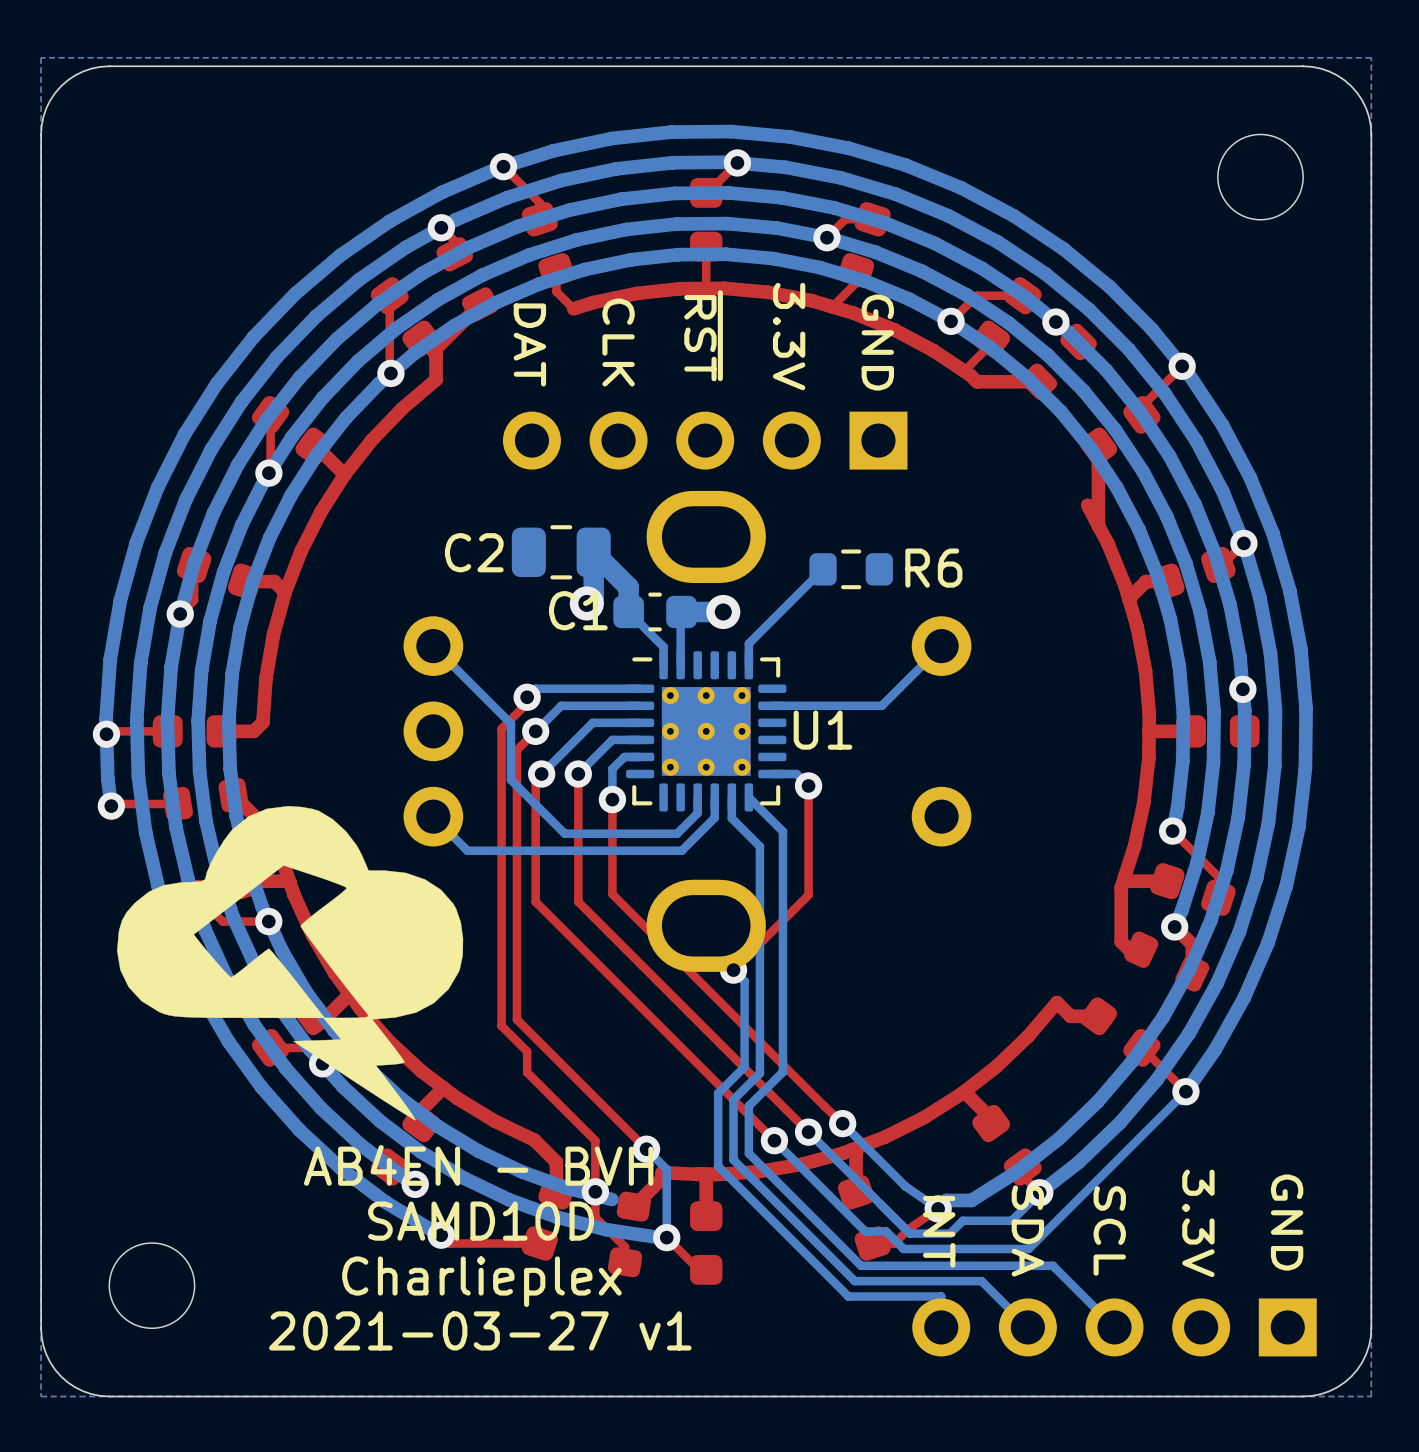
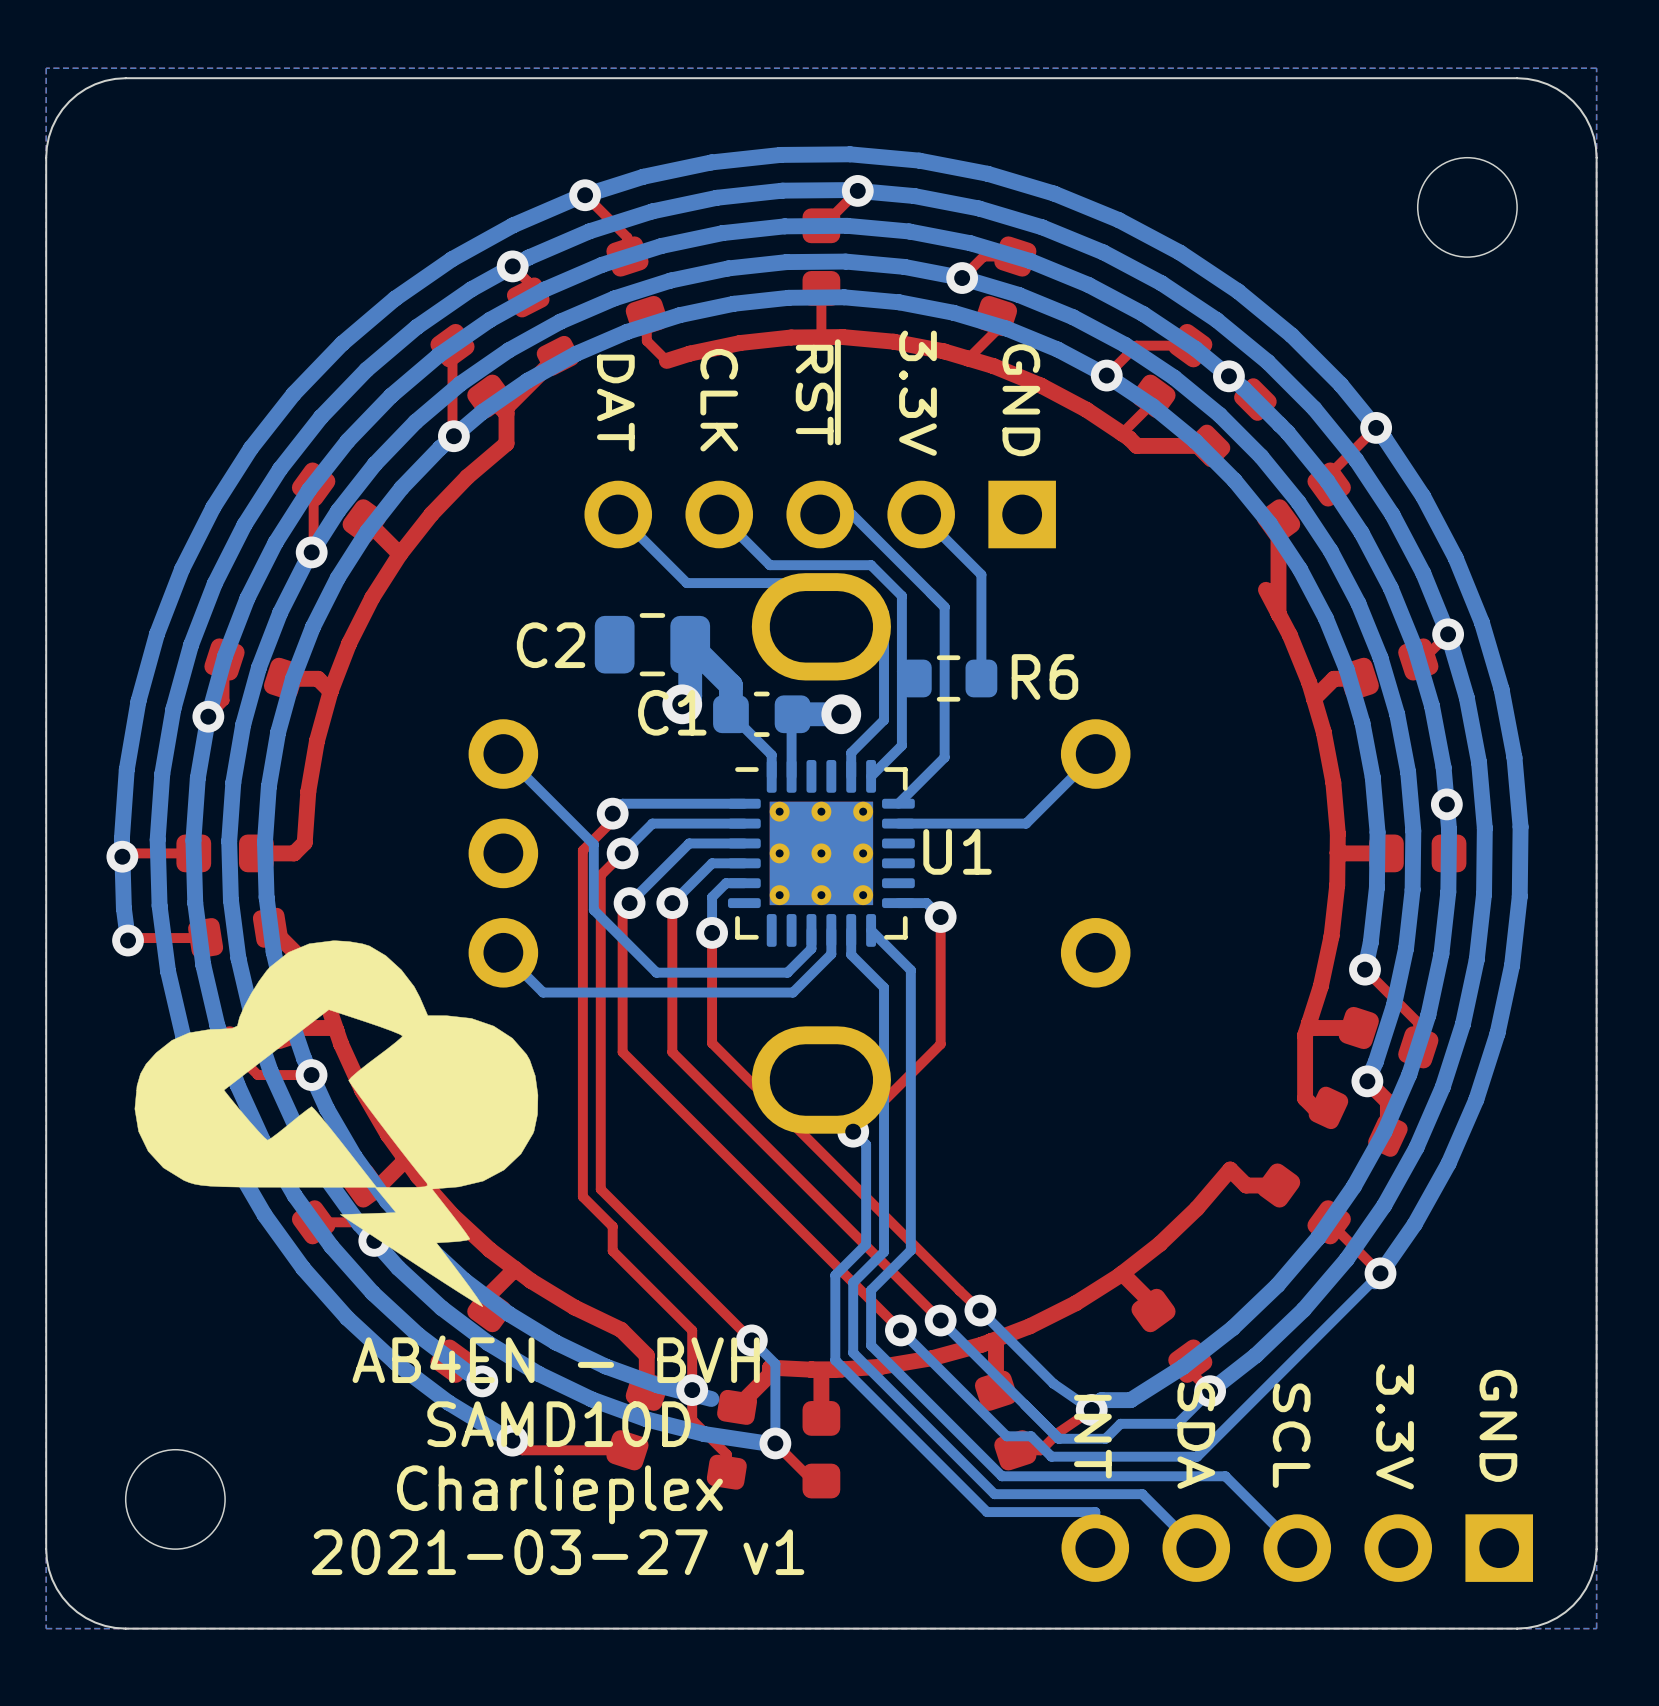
bottom track: none -> (618, 514) (686, 583) (854, 583) (884, 613) (884, 720) (851, 752) (851, 776)
bottom track: none -> (820, 514) (852, 514) (944, 607) (944, 757) (898, 803)
bottom track: none -> (921, 514) (981, 574) (981, 678)
bottom track: (823, 569) (748, 643) (748, 665) -> (719, 514) (769, 565) (871, 565) (901, 596) (901, 745) (871, 776)
R6 position: (851, 569) -> (948, 678)

